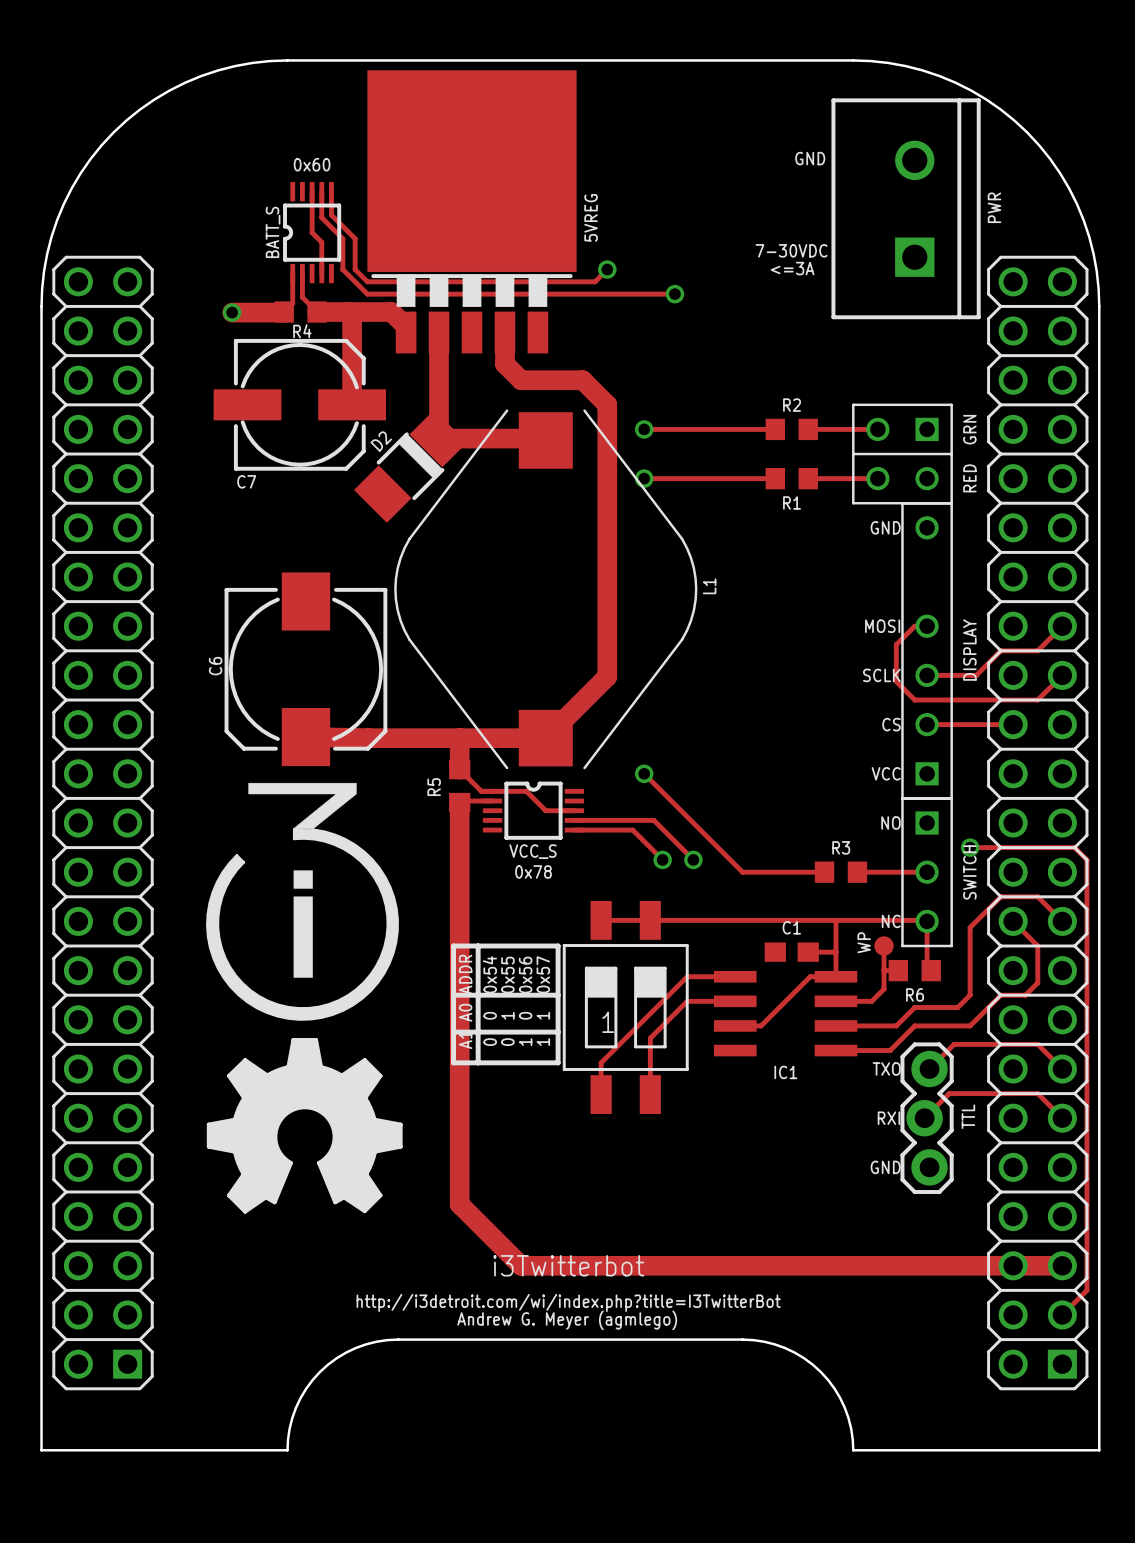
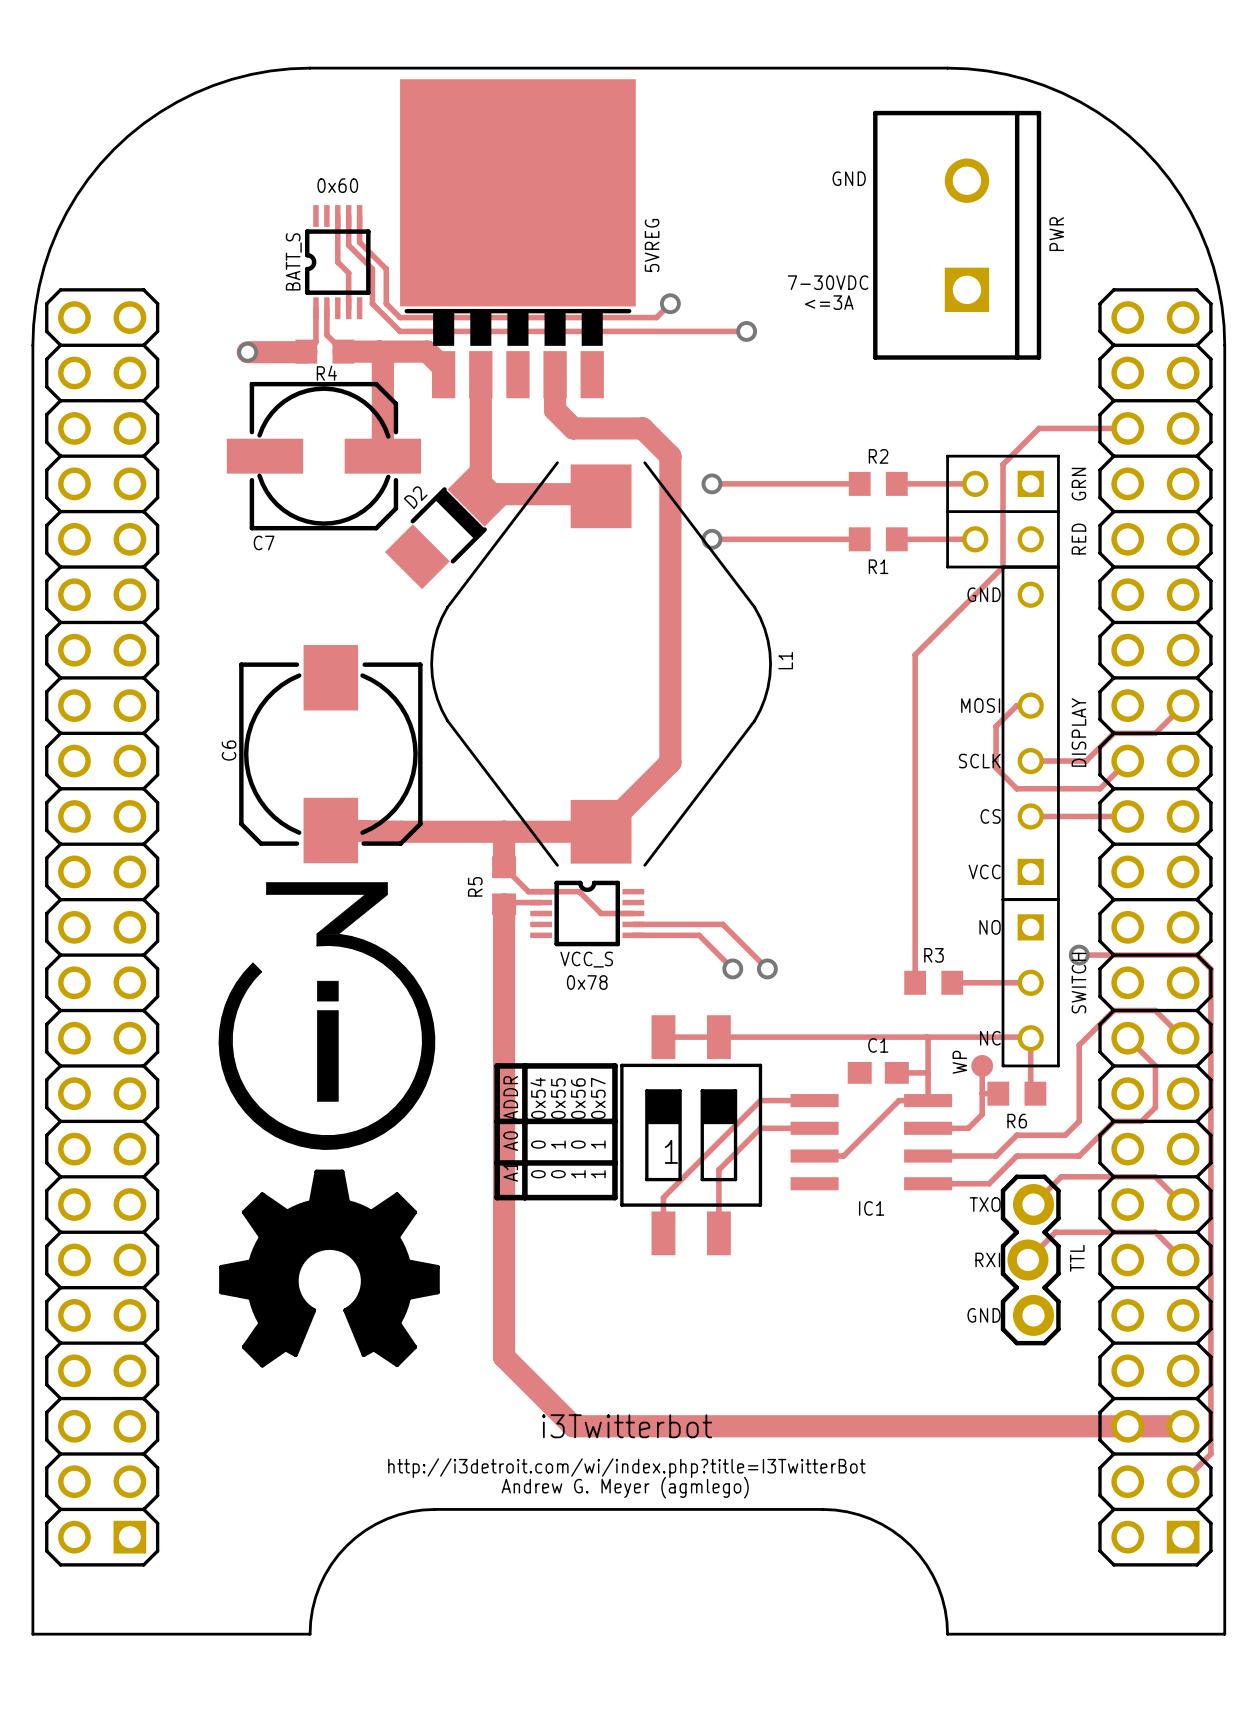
text position: GND (810, 158) -> GND (849, 178)
PWR position: (906, 208) -> (957, 235)
text position: 7-30VDC (791, 250) -> 7-30VDC (828, 282)
text position: <=3A (792, 268) -> <=3A (829, 302)
track: (1062, 675) (1037, 700) (988, 700) -> (1127, 761) (1100, 788)
track: (644, 773) (742, 872) (824, 872) -> (1127, 428) (1039, 428) (1003, 464) (1003, 567) (915, 654) (915, 982)
via: (644, 773) -> none

